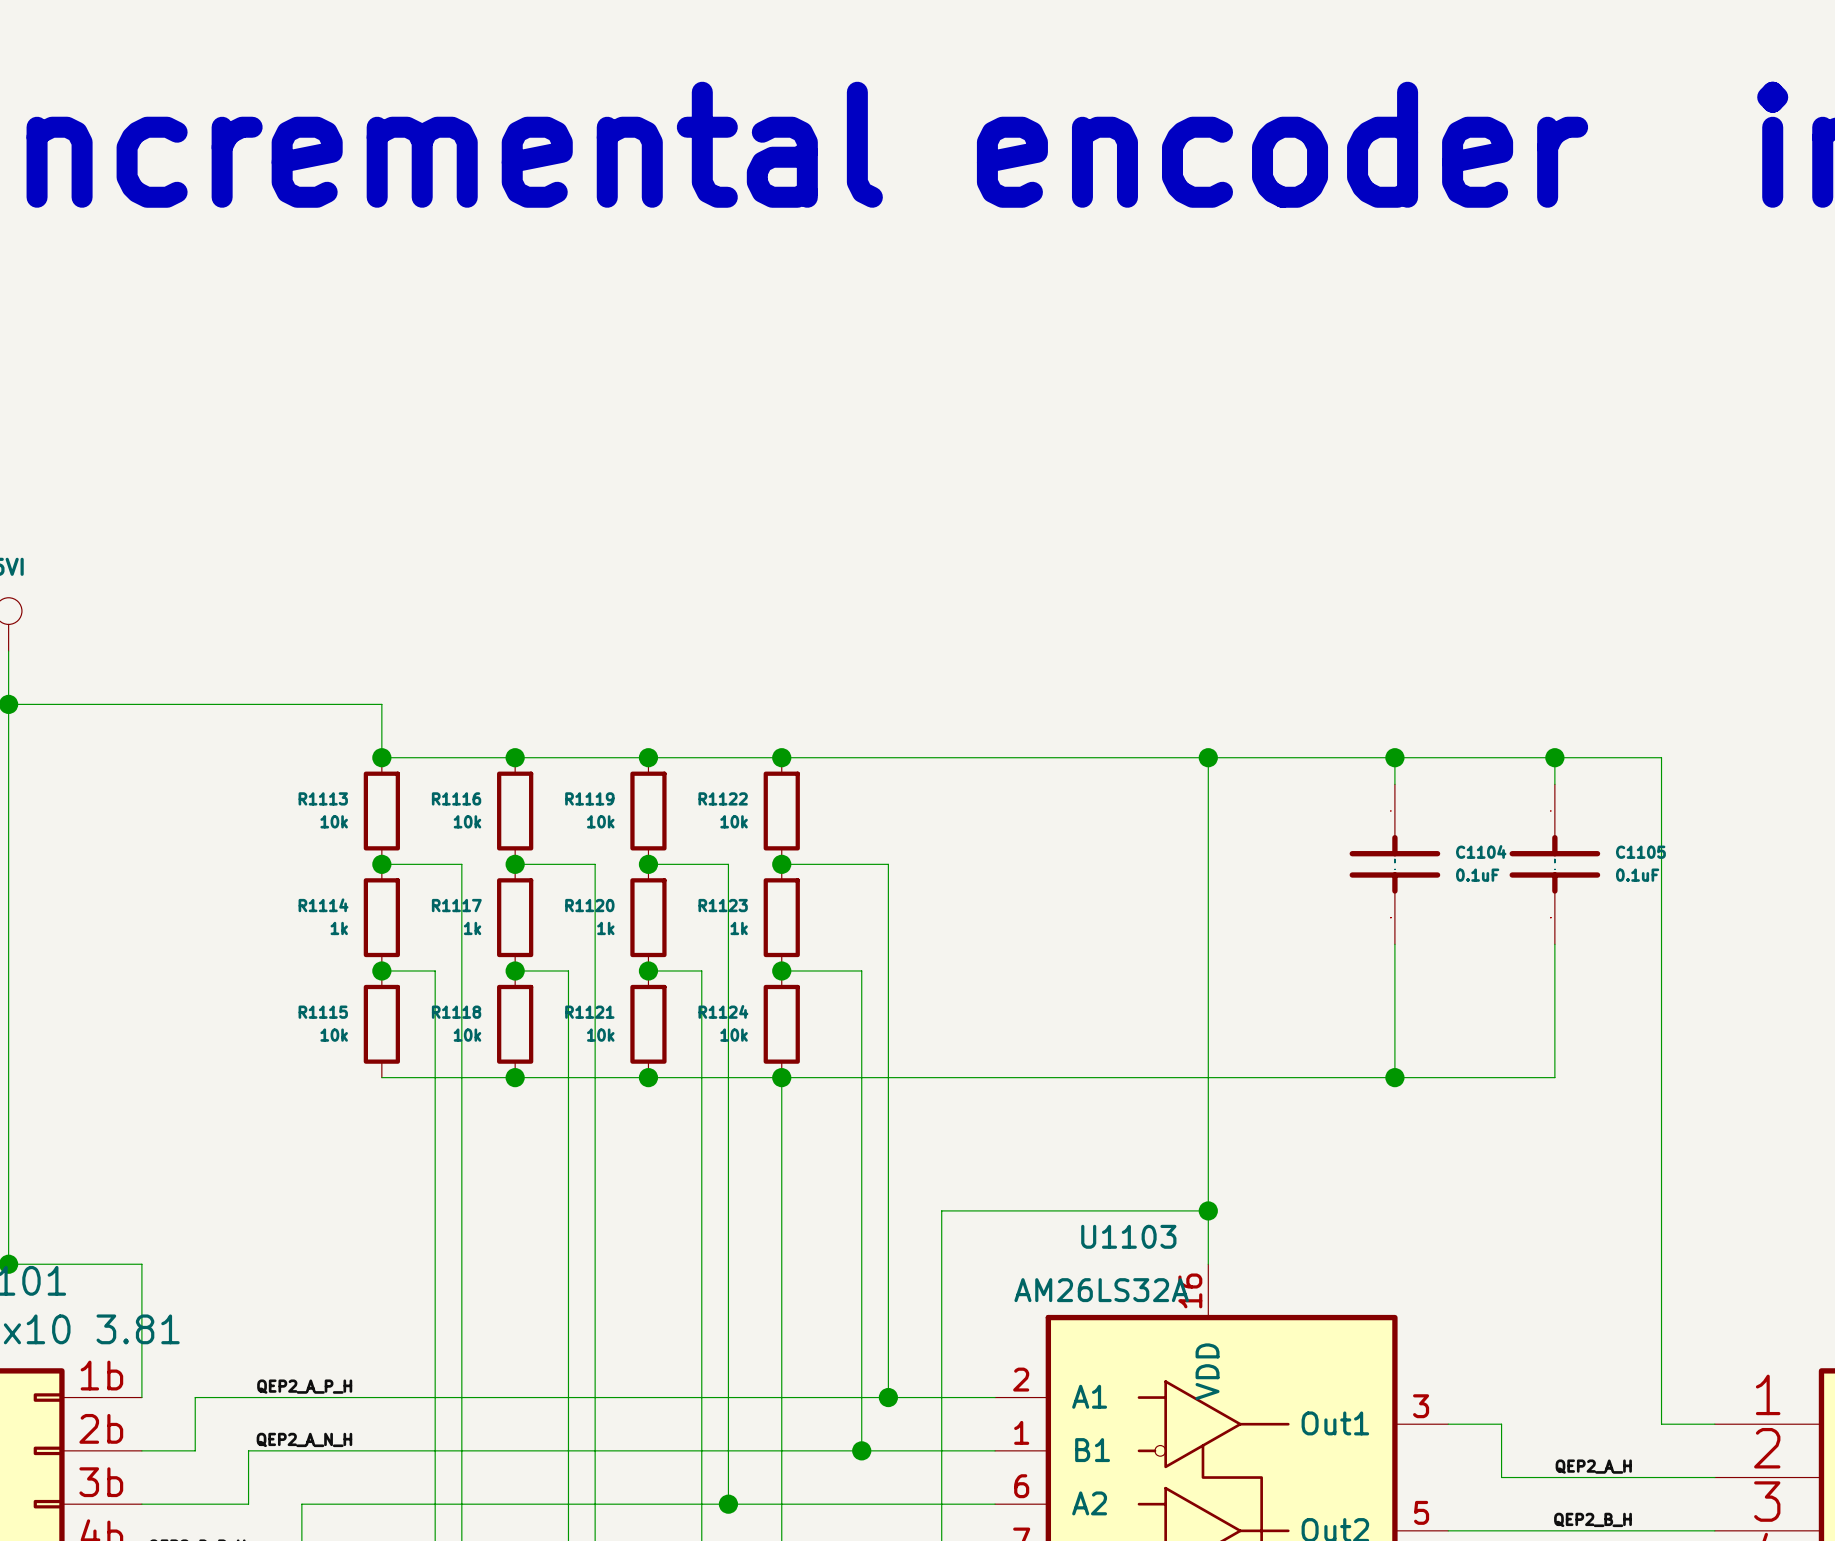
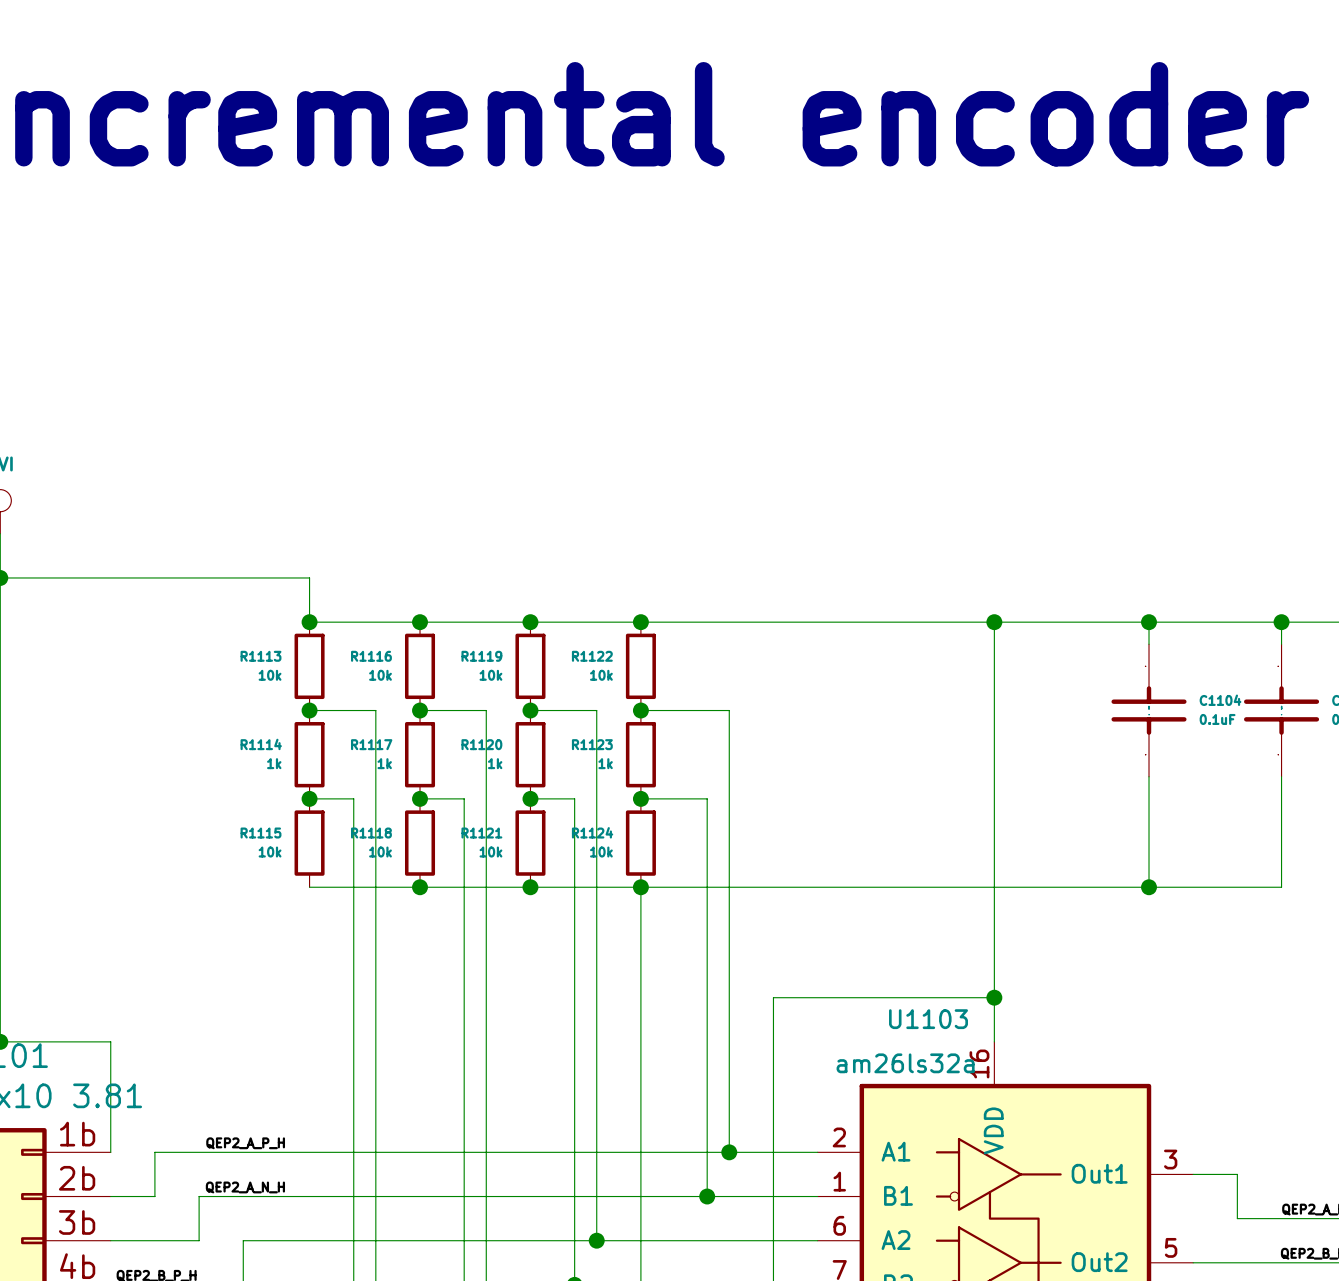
U1103 value: AM26LS32A (1101, 1290) -> am26ls32a (905, 1063)

